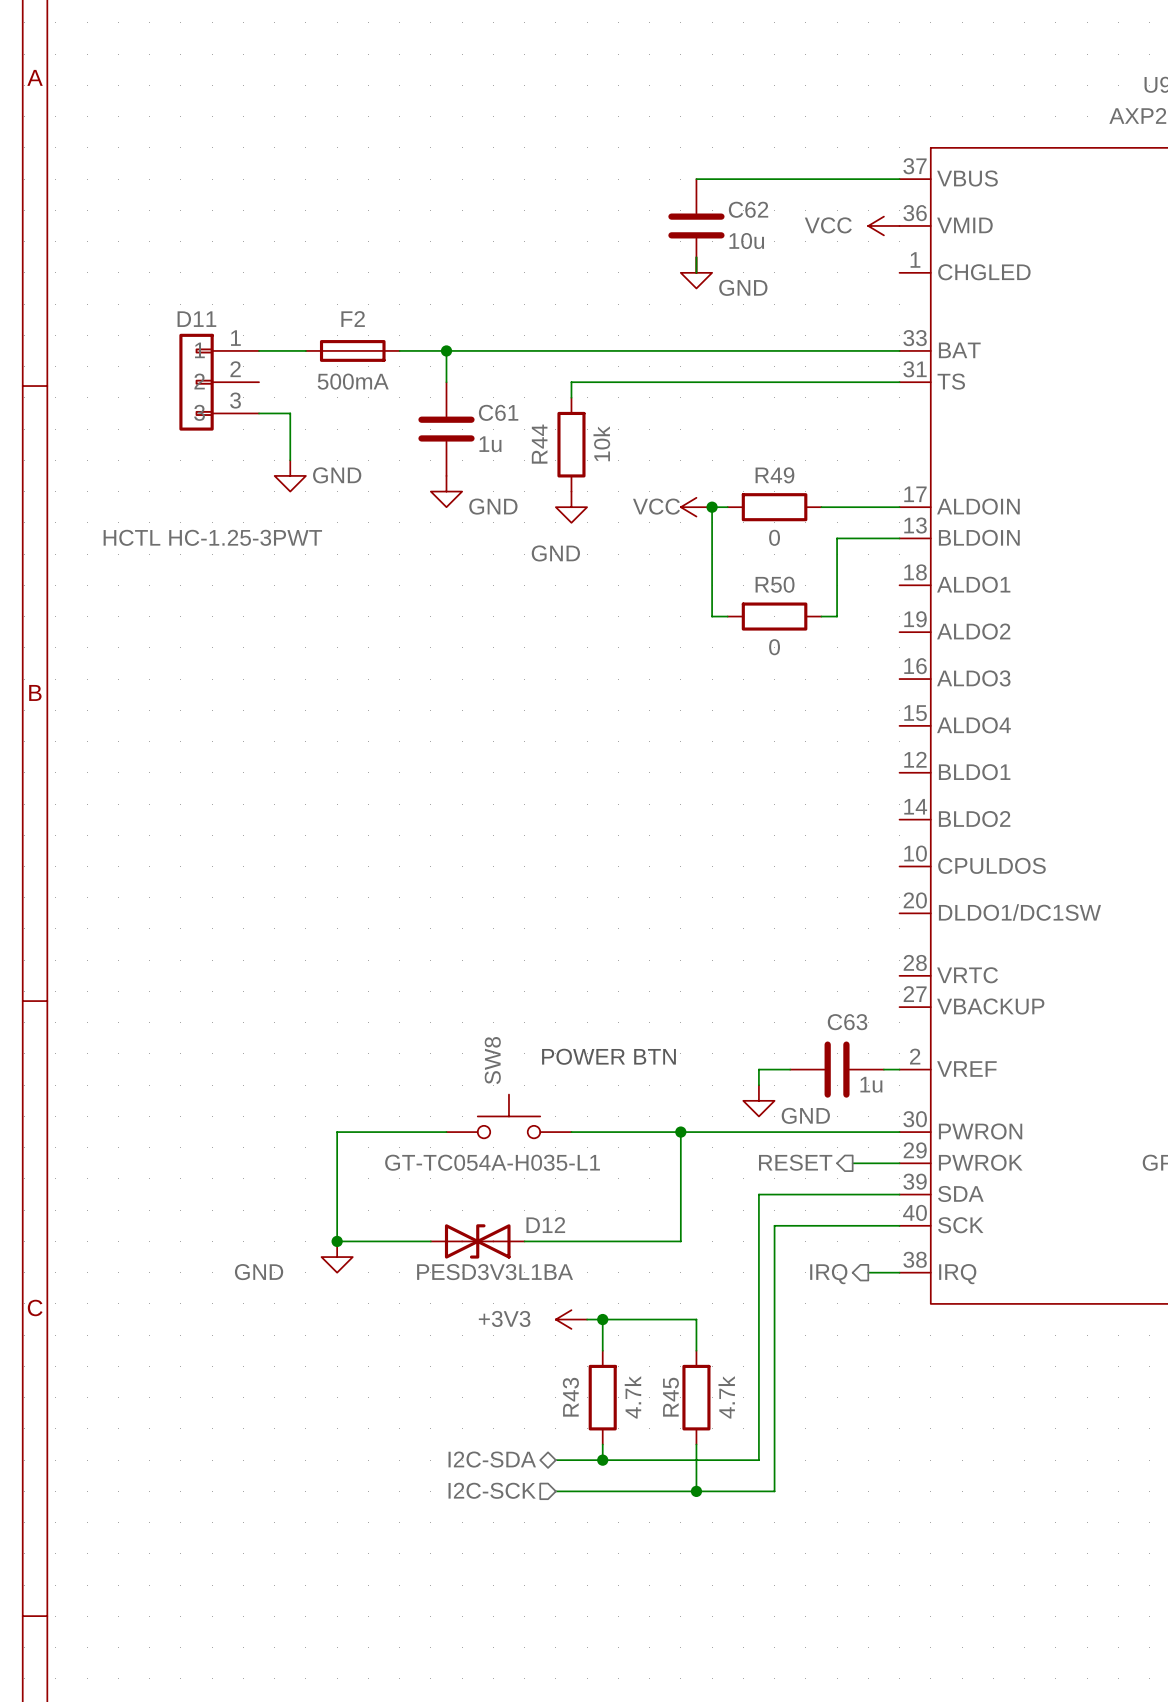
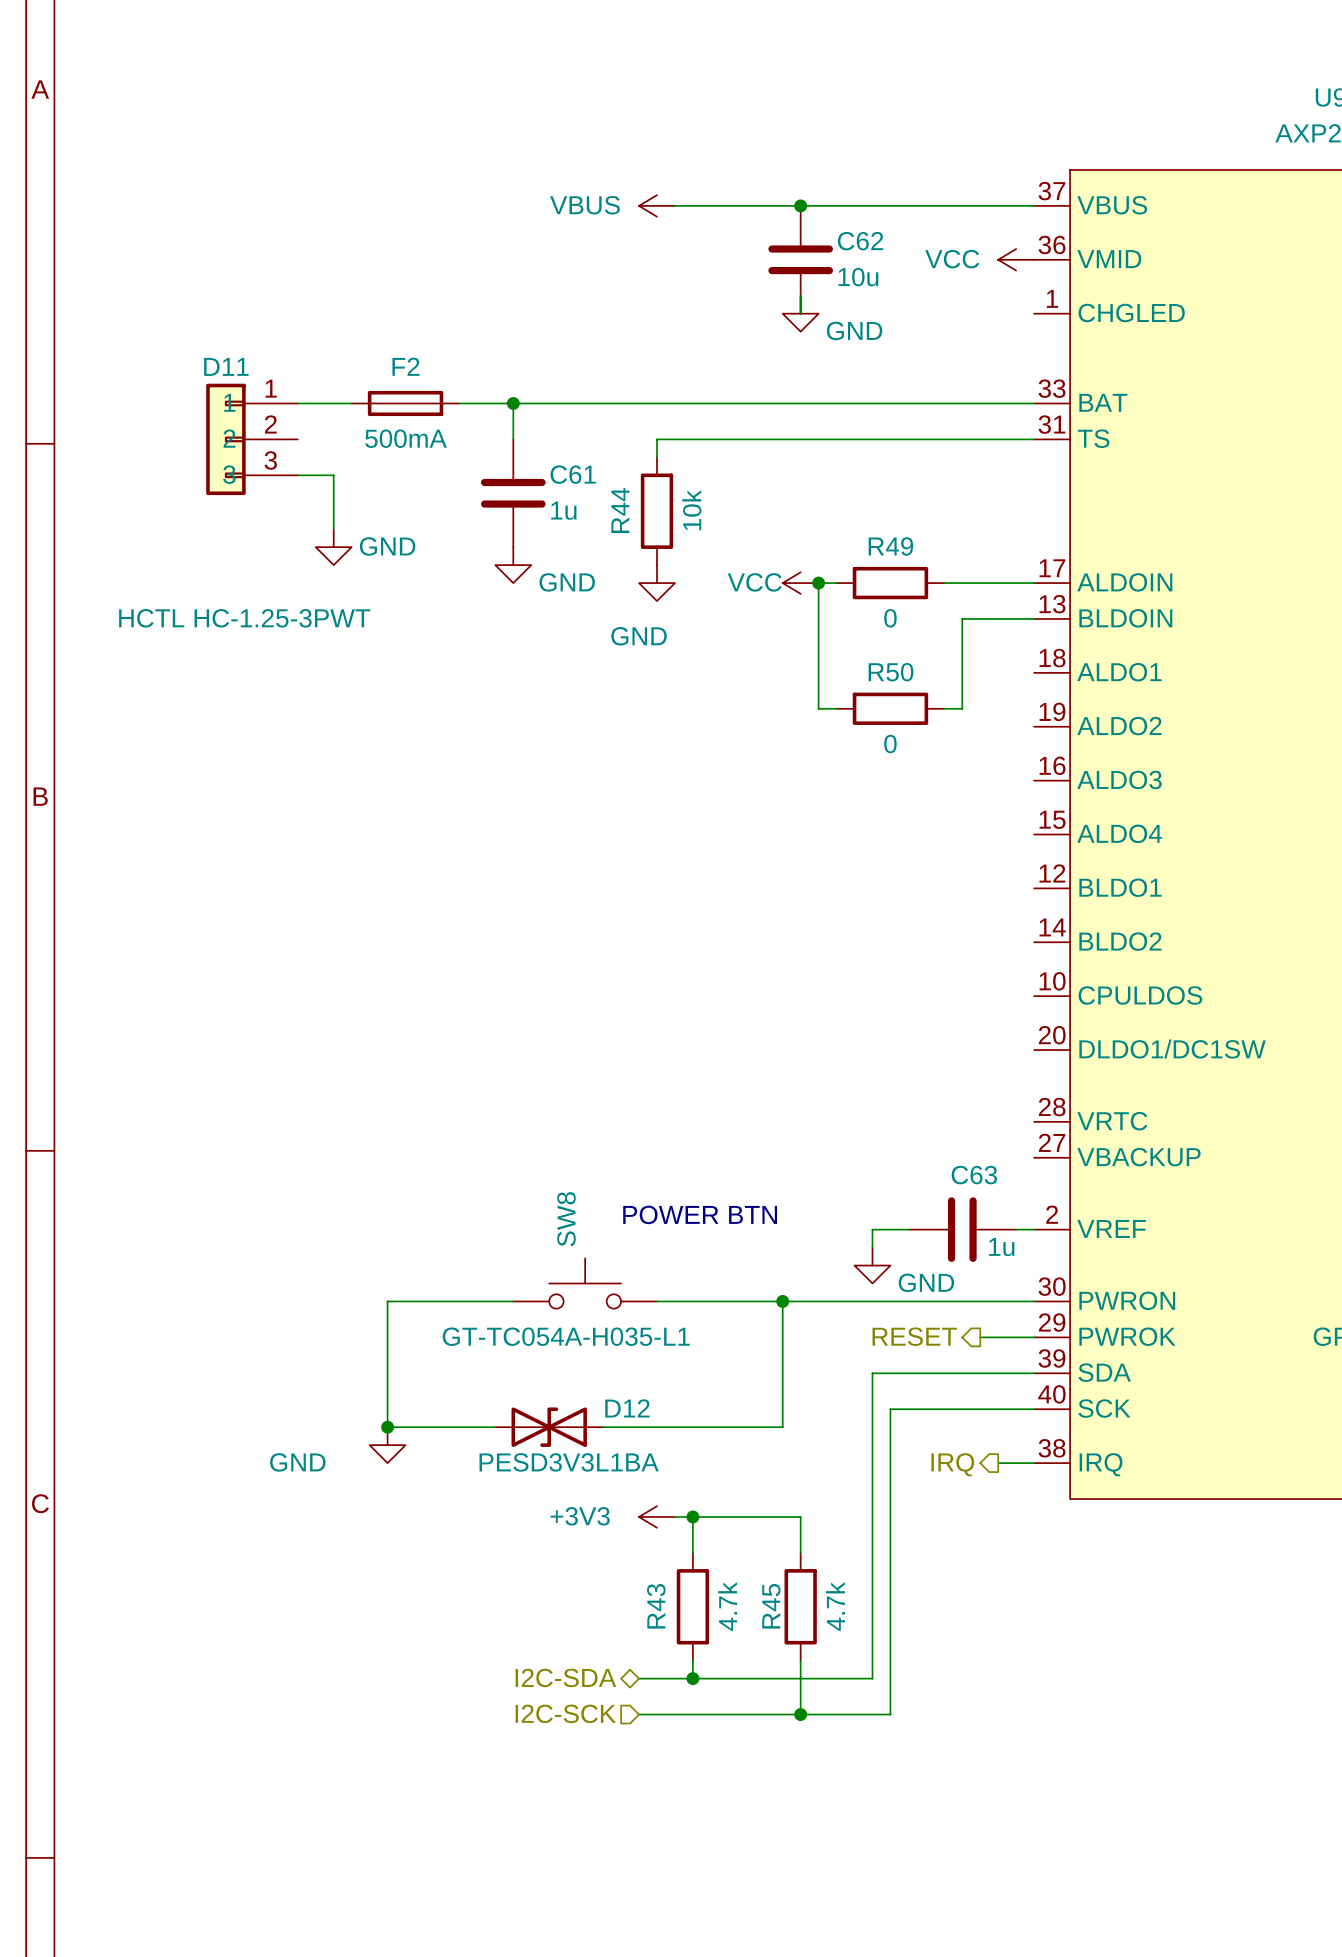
power symbol: none -> VBUS (656, 205)
wire: none -> (674, 205) (800, 205)
junction: none -> (800, 205)

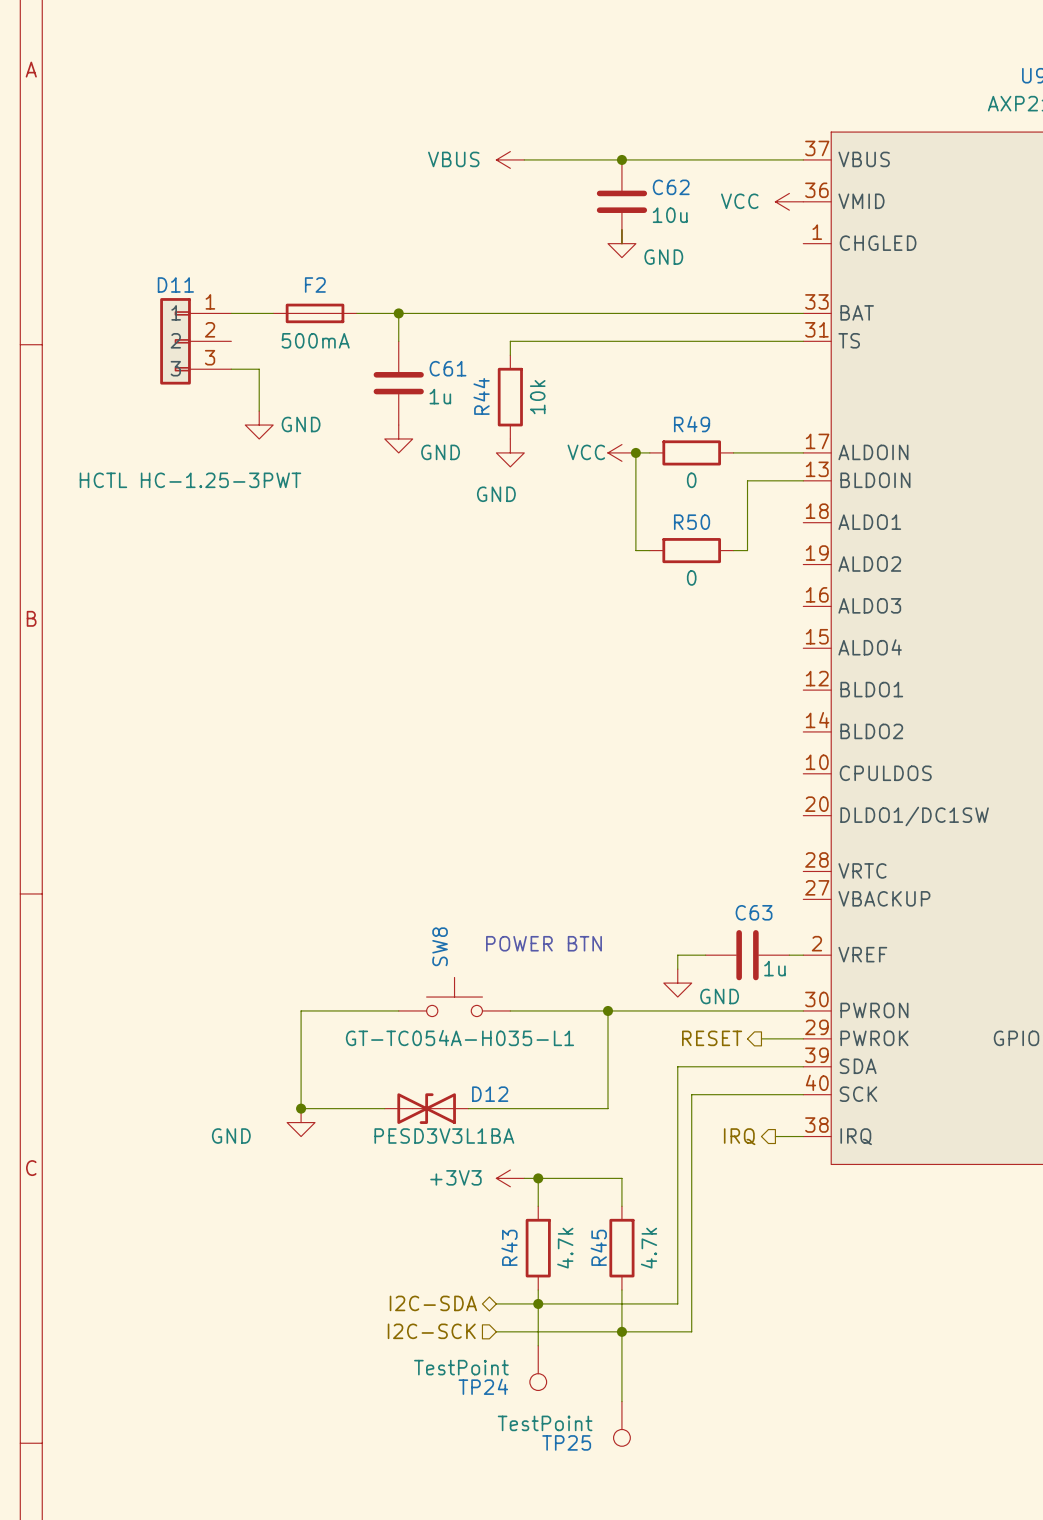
wire: none -> (538, 1303) (538, 1345)
wire: none -> (621, 1331) (621, 1401)
TP24: none -> TestPoint (538, 1368)
TP25: none -> TestPoint (621, 1423)

